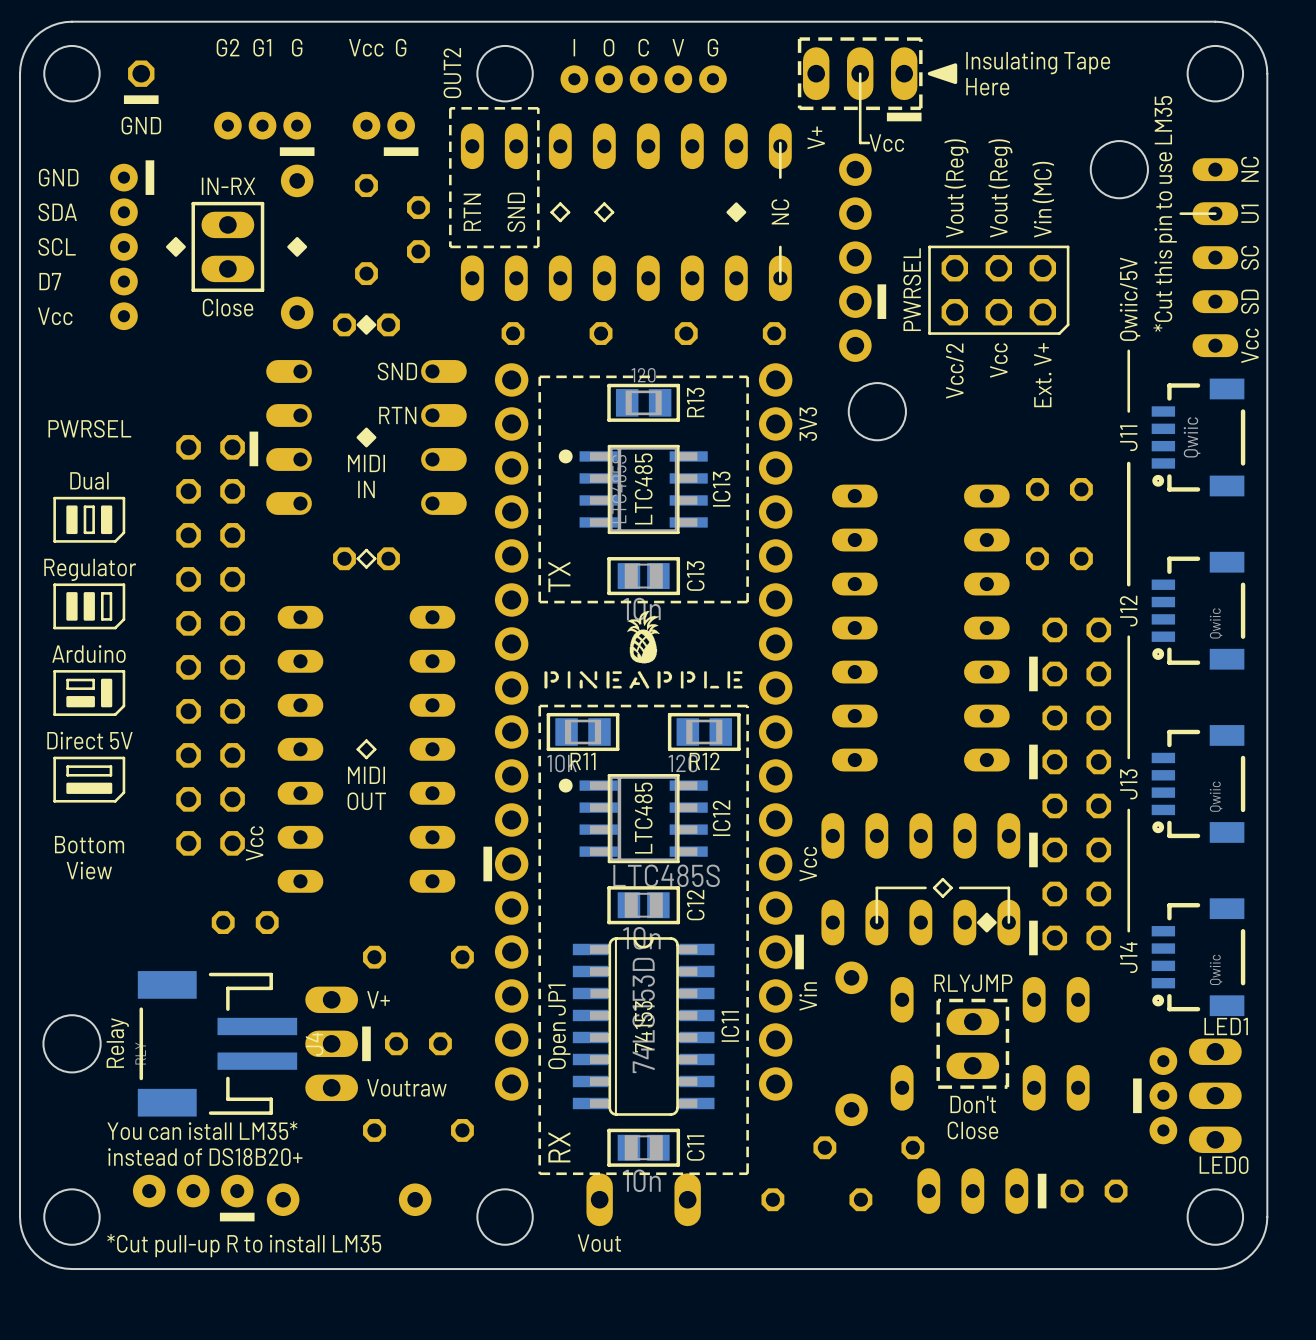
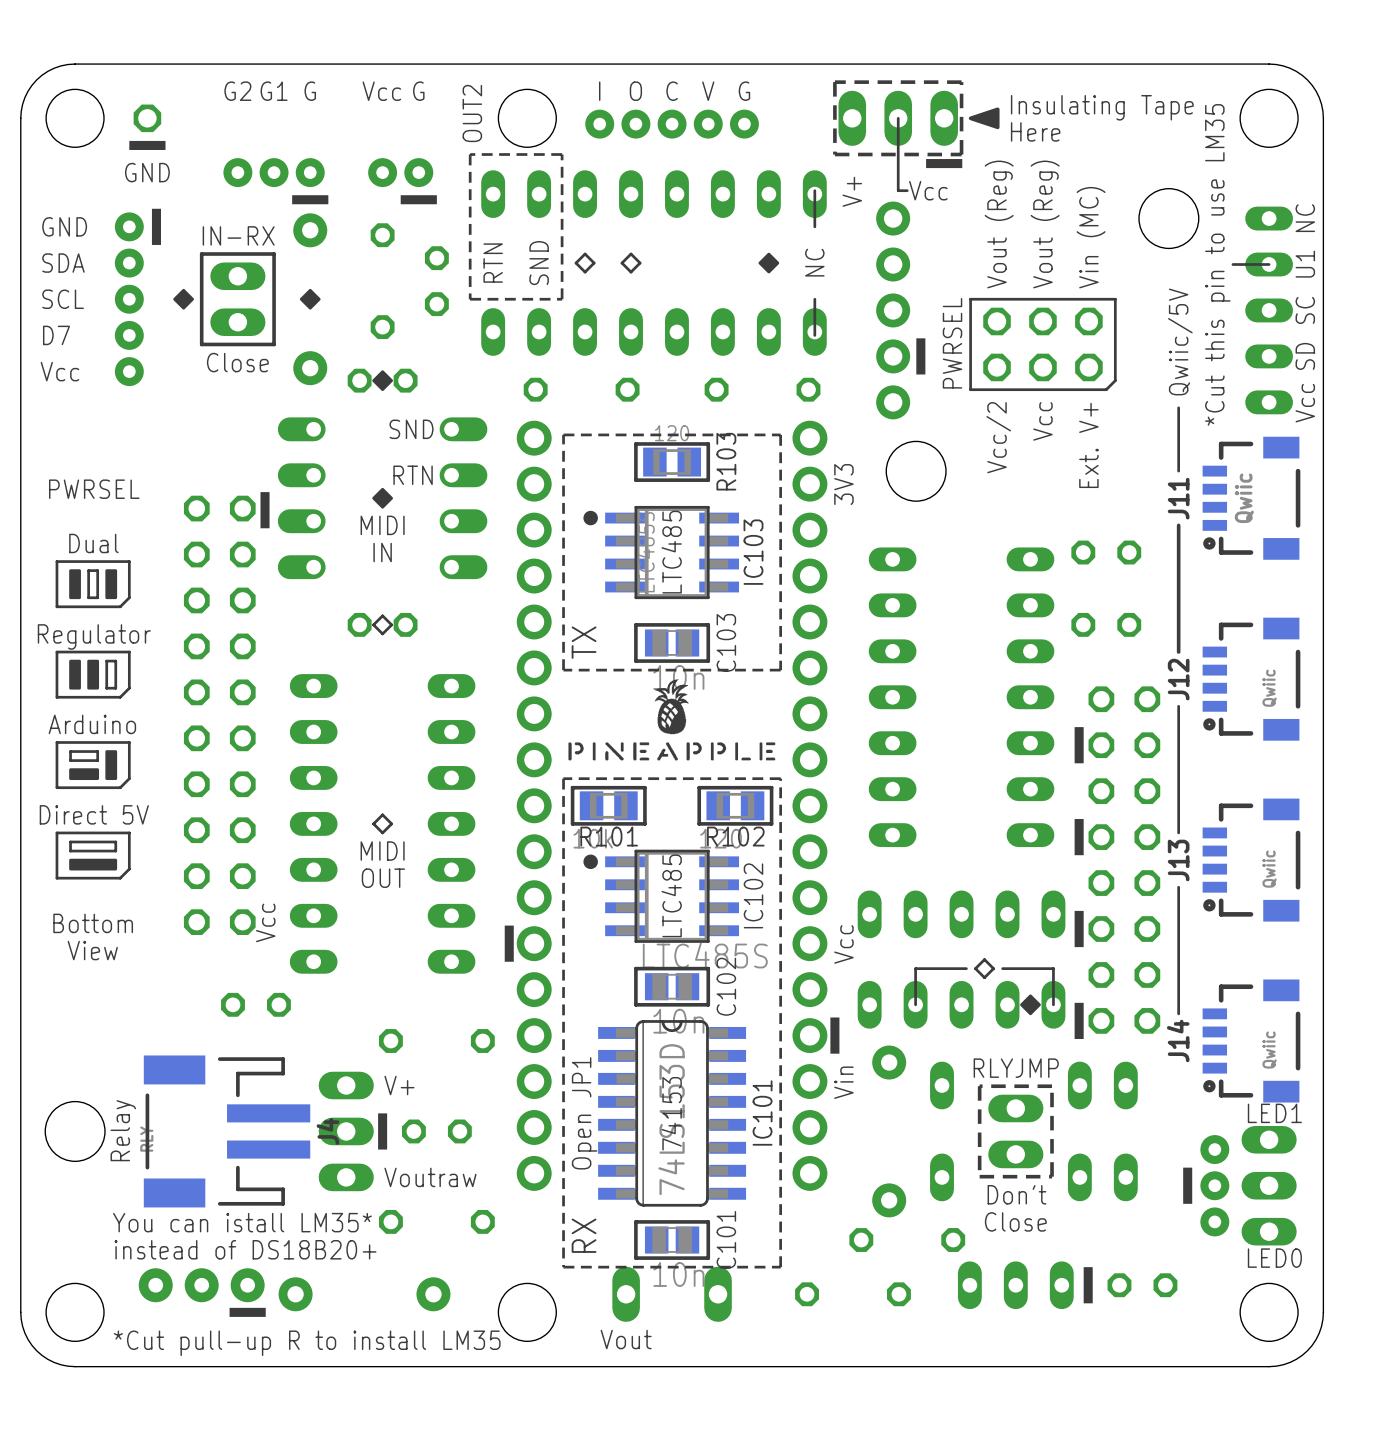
R13 name: R13 (695, 402) -> R103 (726, 461)
IC13 name: IC13 (721, 489) -> IC103 (753, 552)
C13 name: C13 (695, 575) -> C103 (726, 642)
R11 name: R11 (583, 761) -> R101 (609, 836)
R12 name: R12 (704, 761) -> R102 (735, 836)
IC12 name: IC12 (721, 818) -> IC102 (753, 895)
C12 name: C12 (695, 905) -> C102 (726, 986)
IC11 name: IC11 (730, 1026) -> IC101 (762, 1112)
C11 name: C11 (695, 1147) -> C101 (726, 1240)

